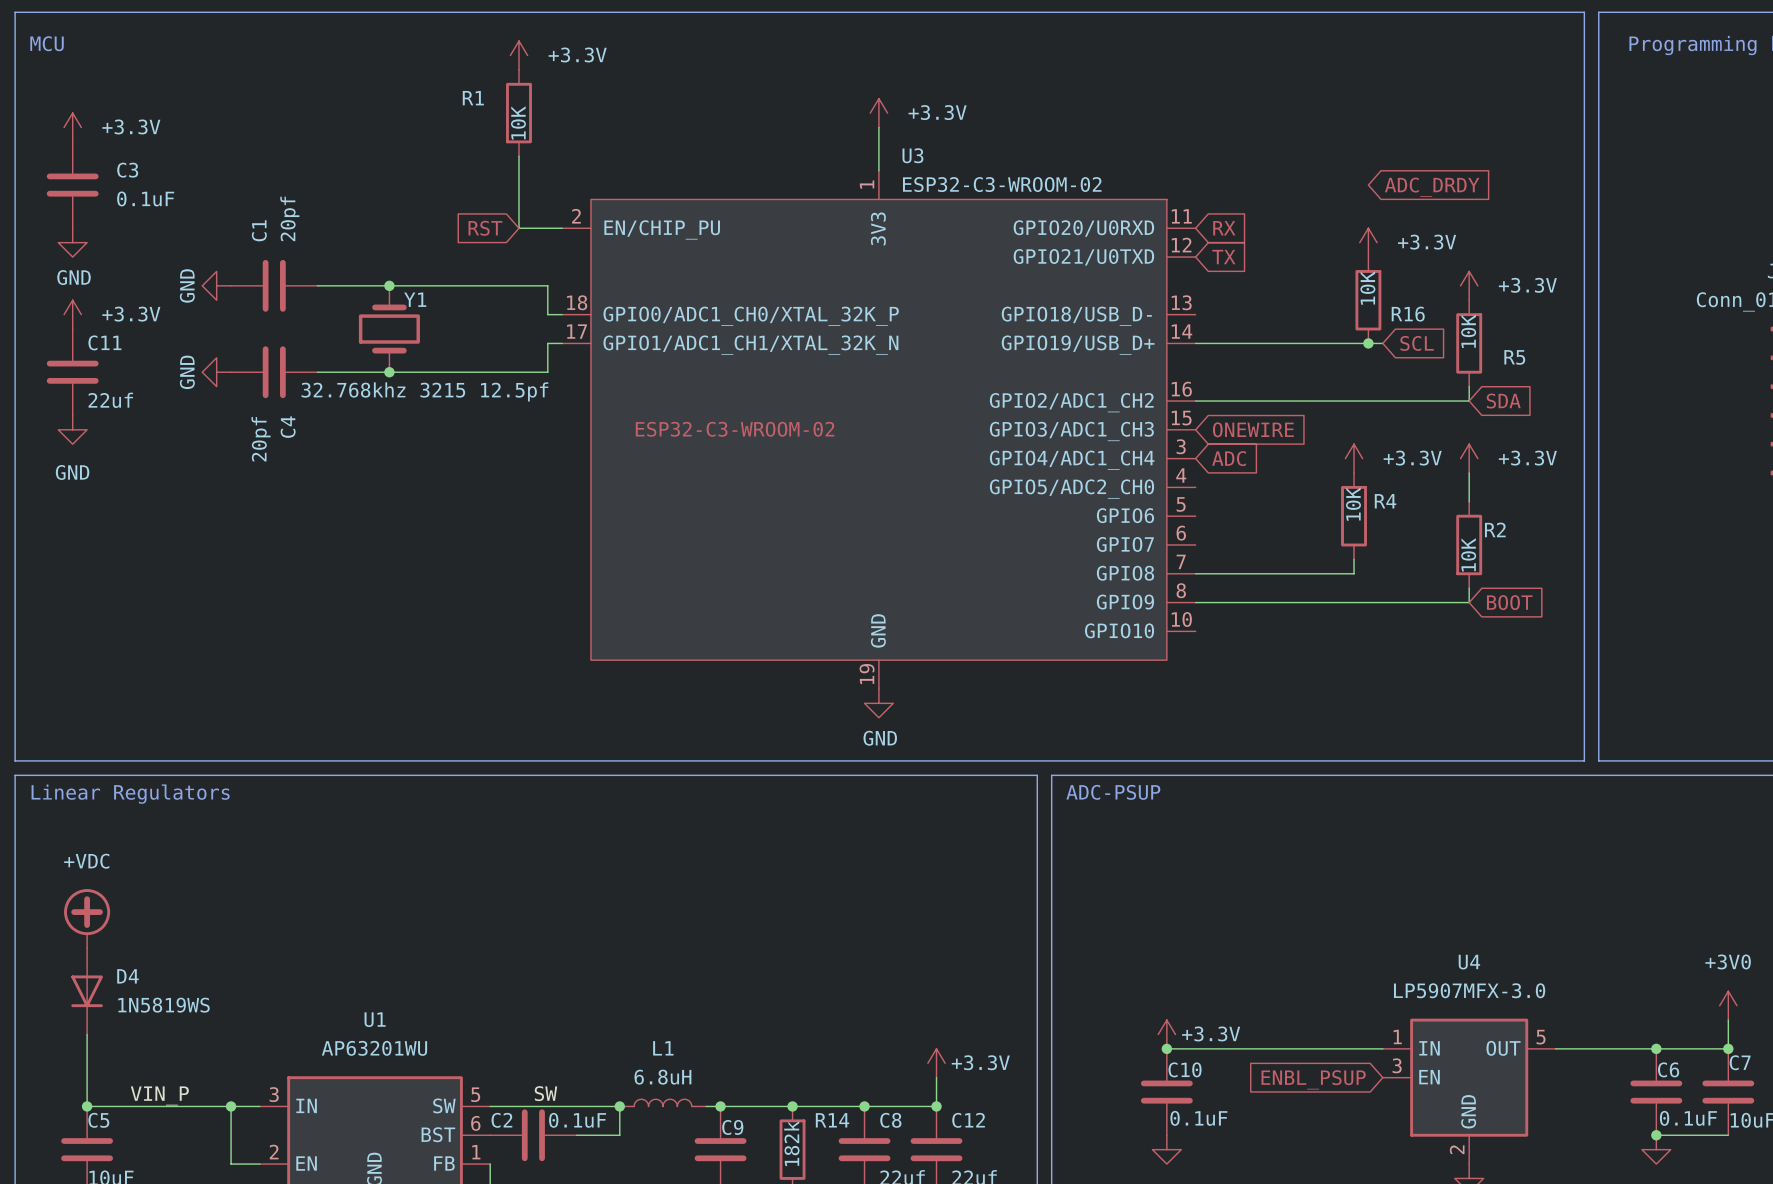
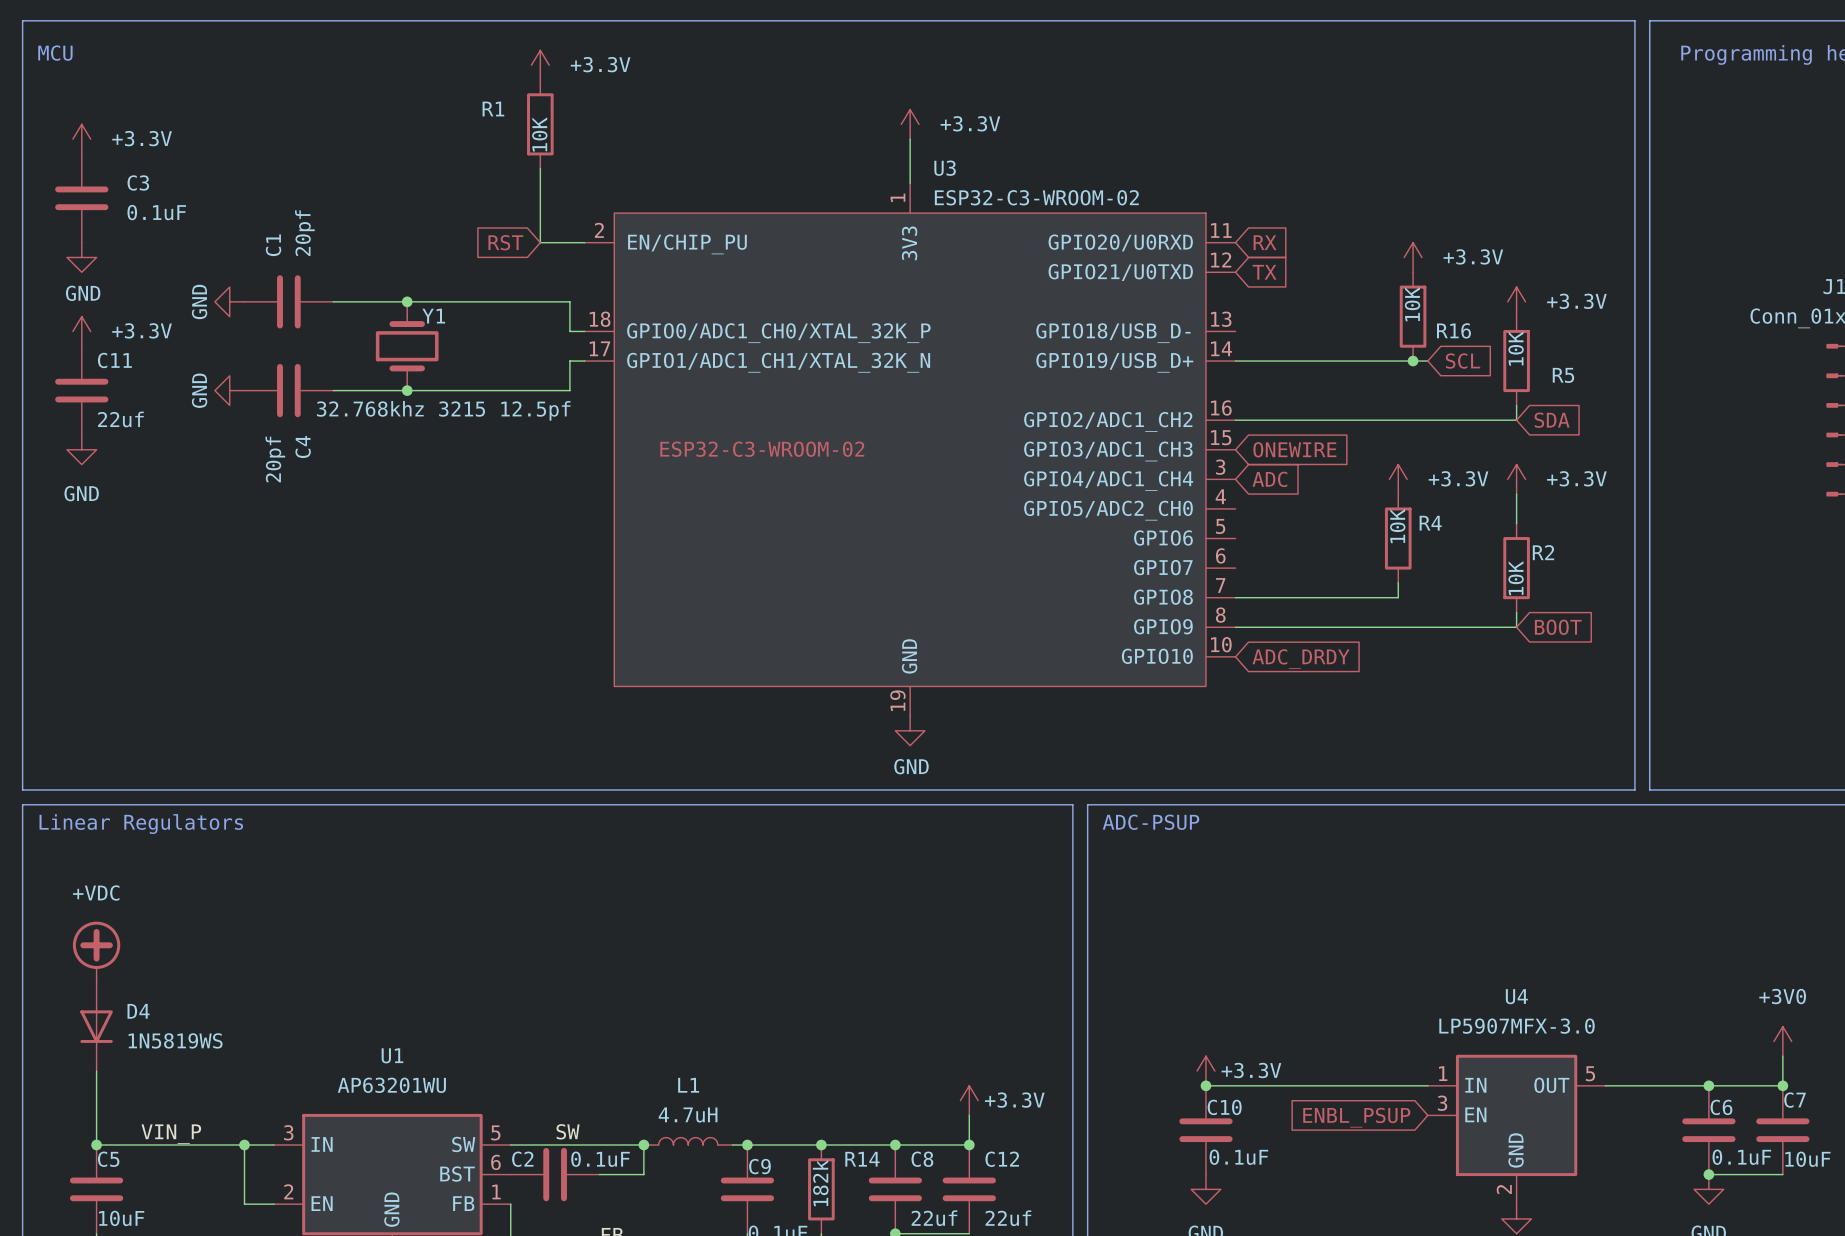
global label: ADC_DRDY (1432, 187) -> none
global label: none -> ADC_DRDY (1301, 659)
L1 value: 6.8uH (662, 1077) -> 4.7uH (688, 1115)

